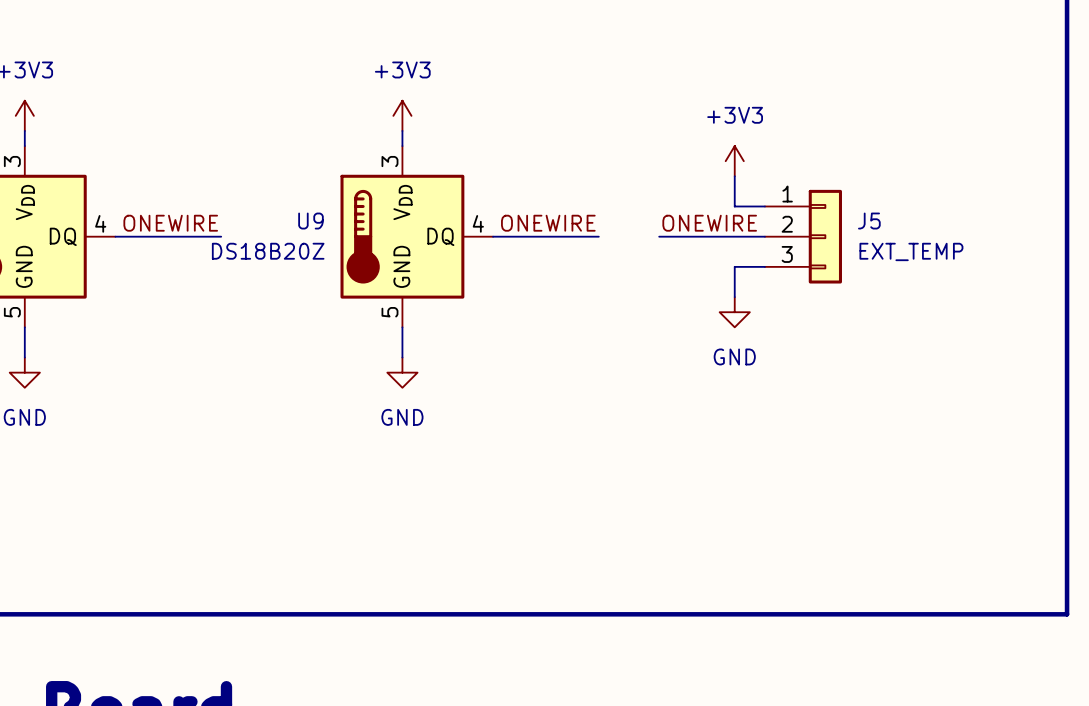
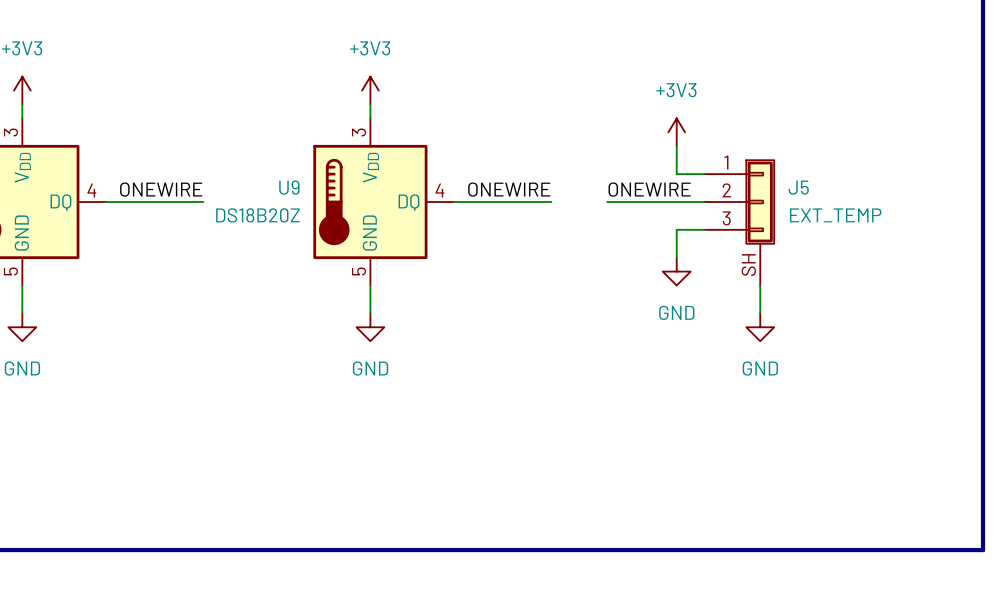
J5 symbol: [764, 189, 842, 284] -> [704, 159, 776, 286]
wire: none -> (760, 285) (760, 313)
power symbol: none -> GND (760, 327)

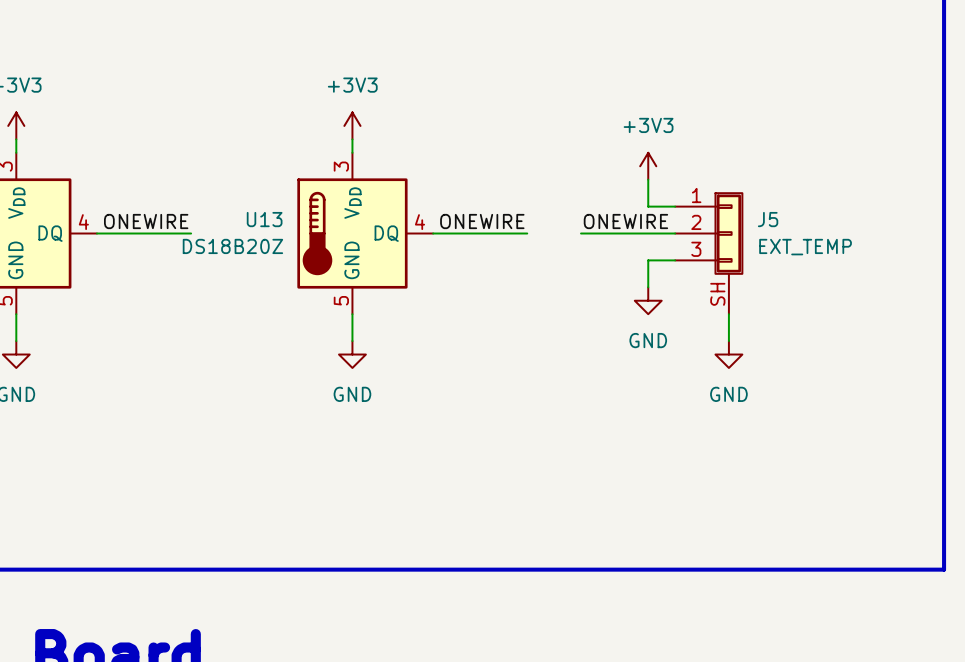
U9 name: U9 (289, 187) -> U13 (264, 219)

